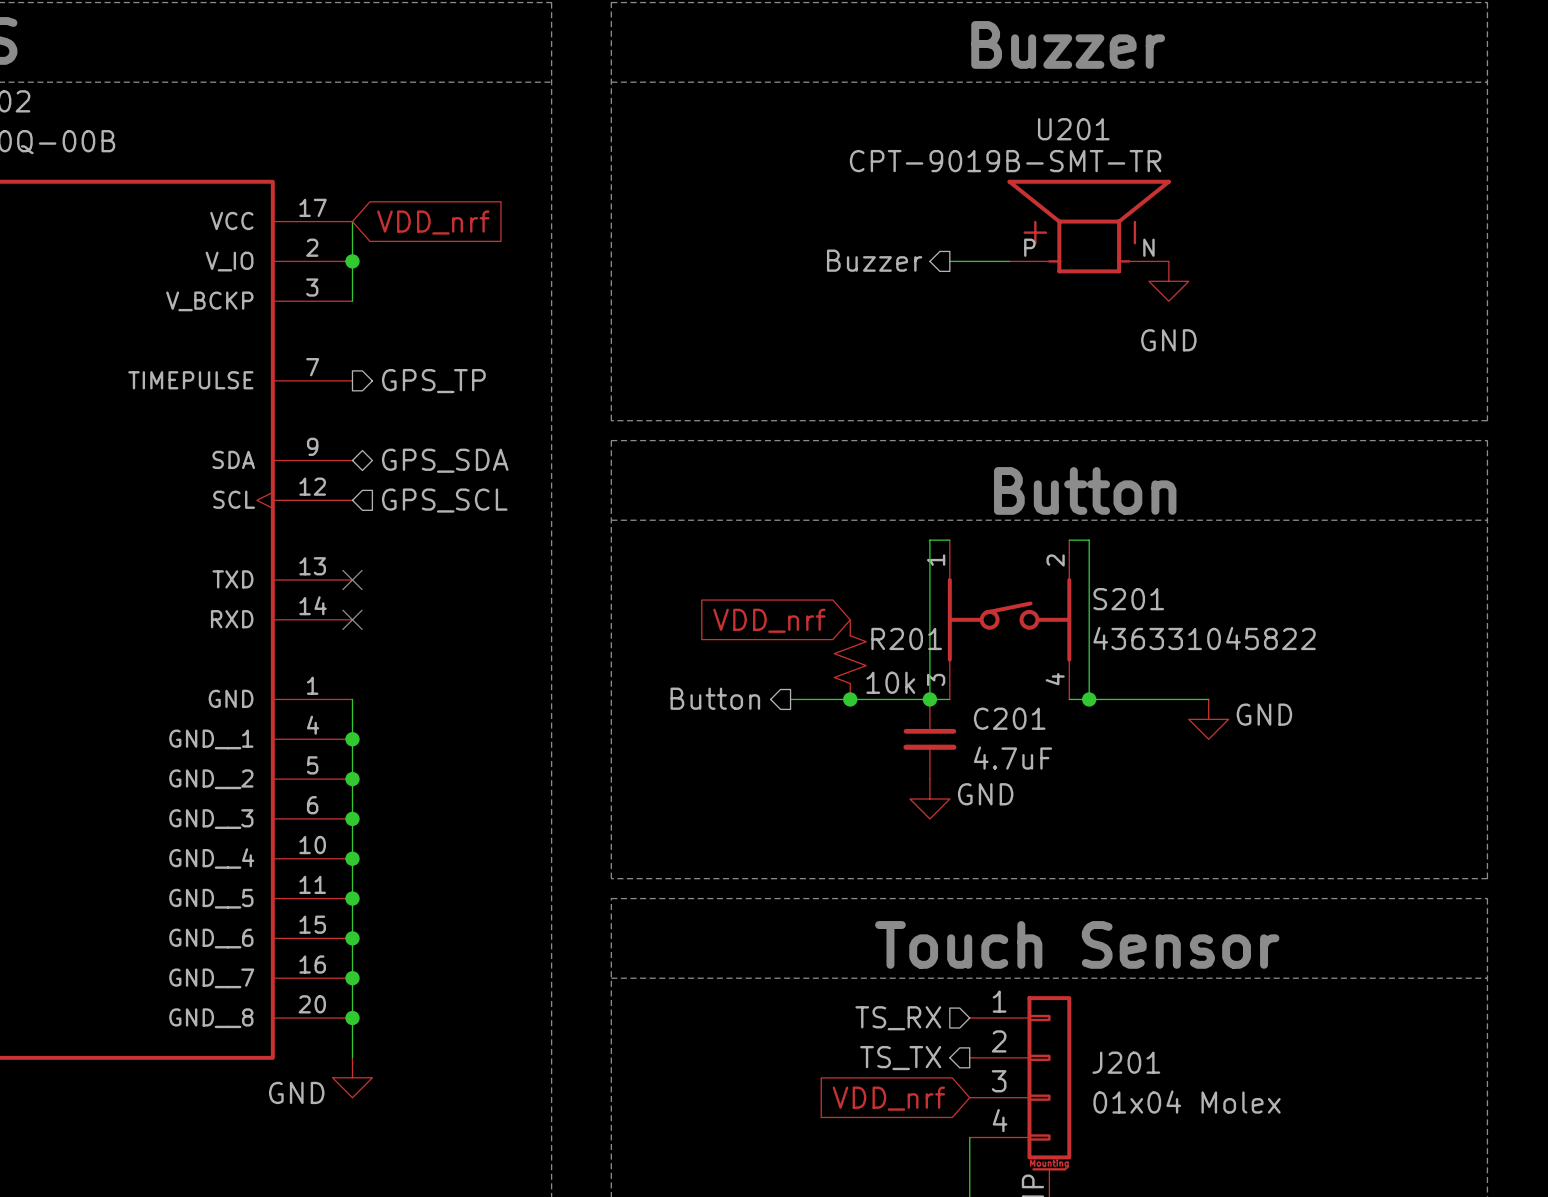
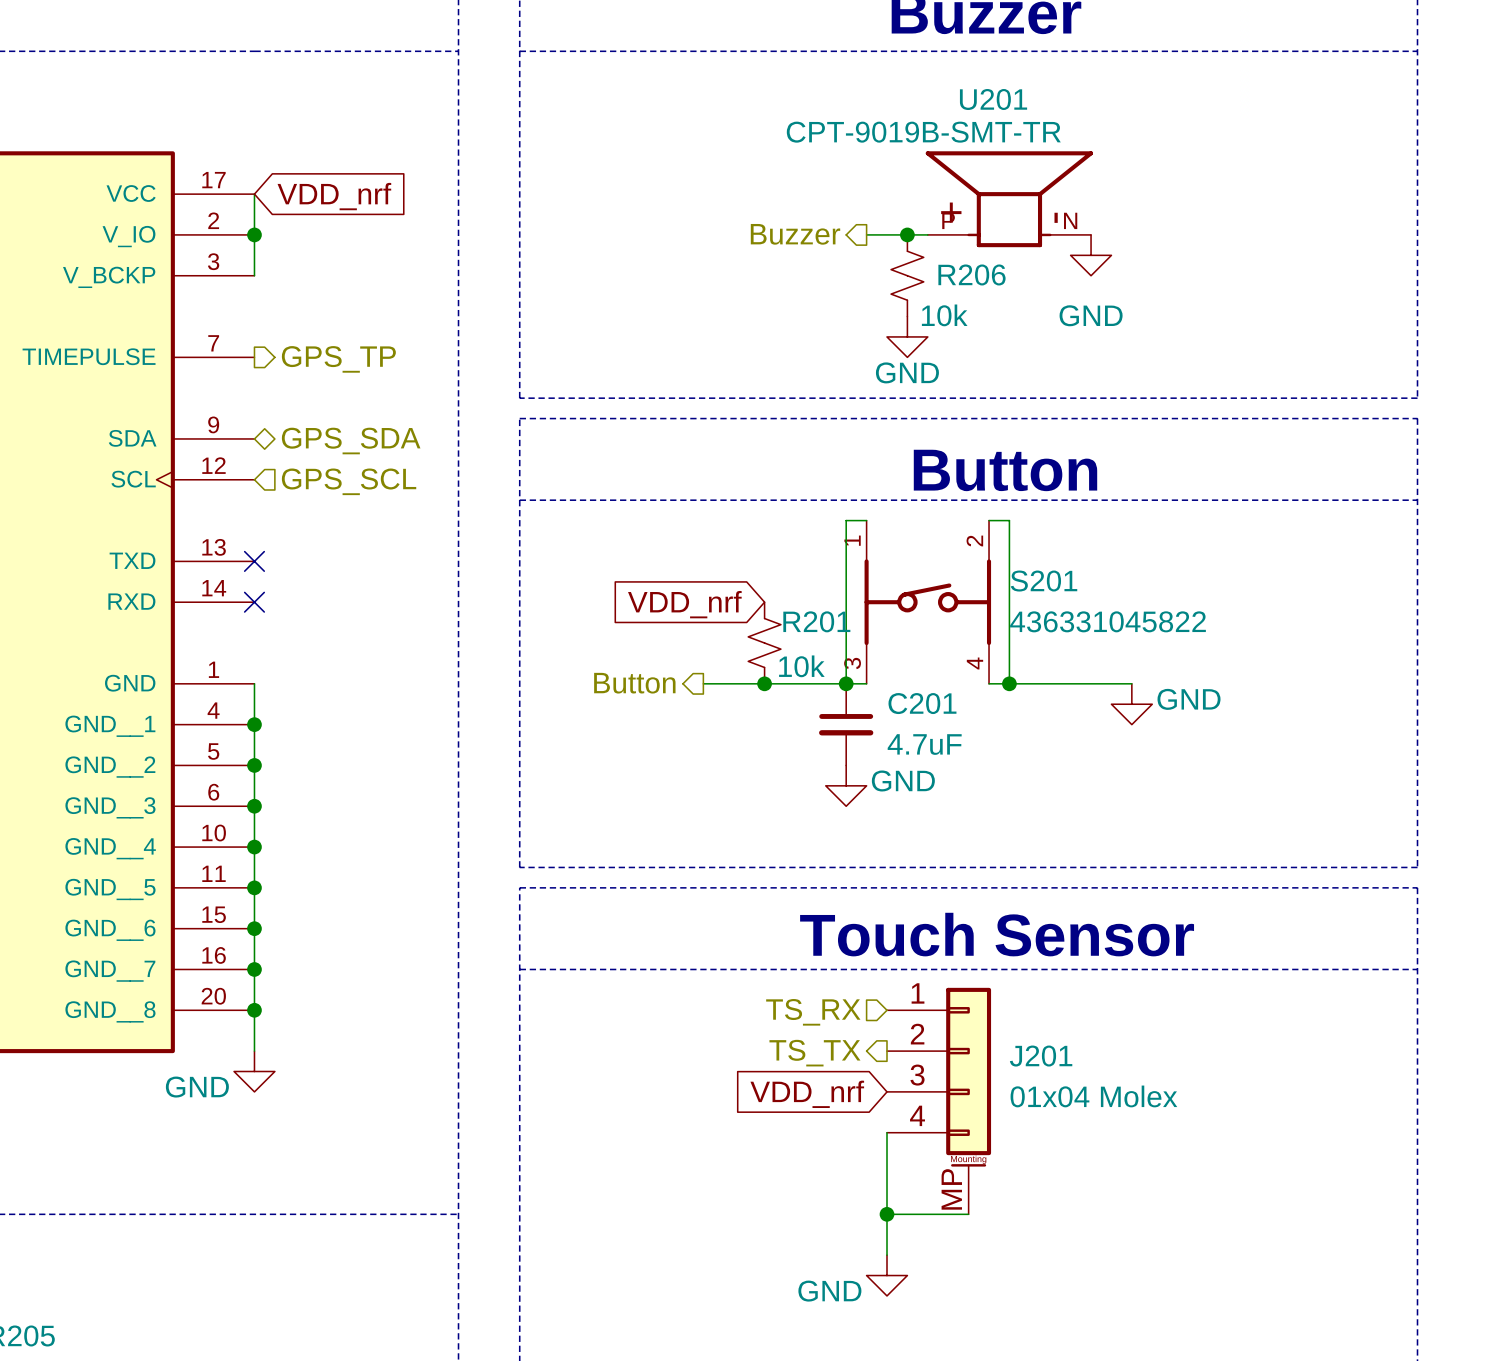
junction: none -> (907, 234)
R206: none -> 10k (907, 275)
power symbol: none -> GND (907, 336)

